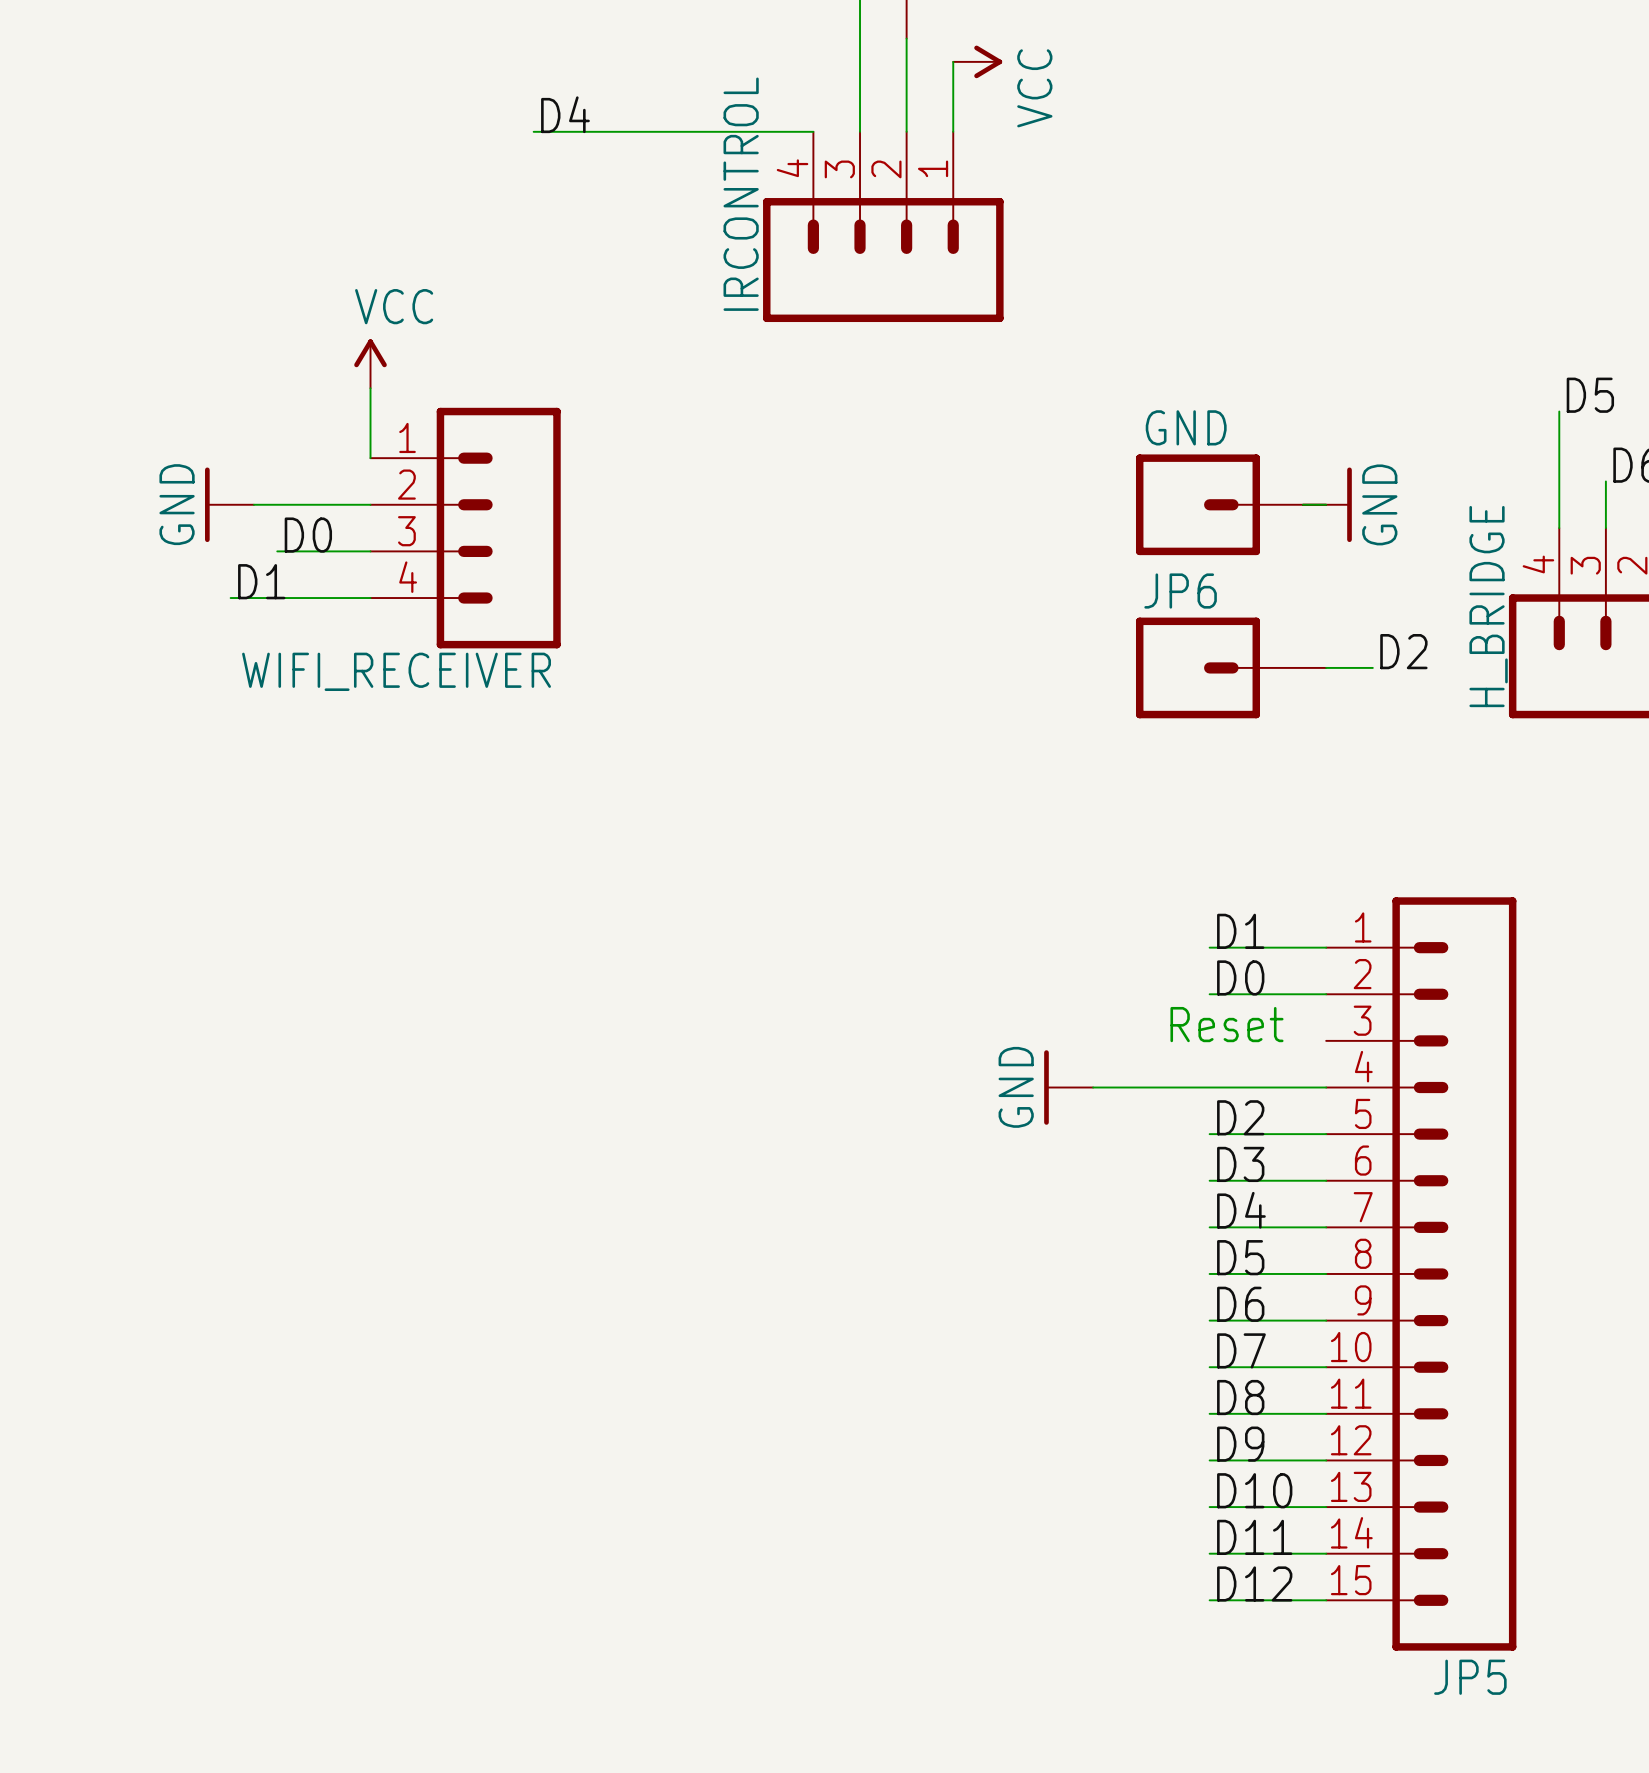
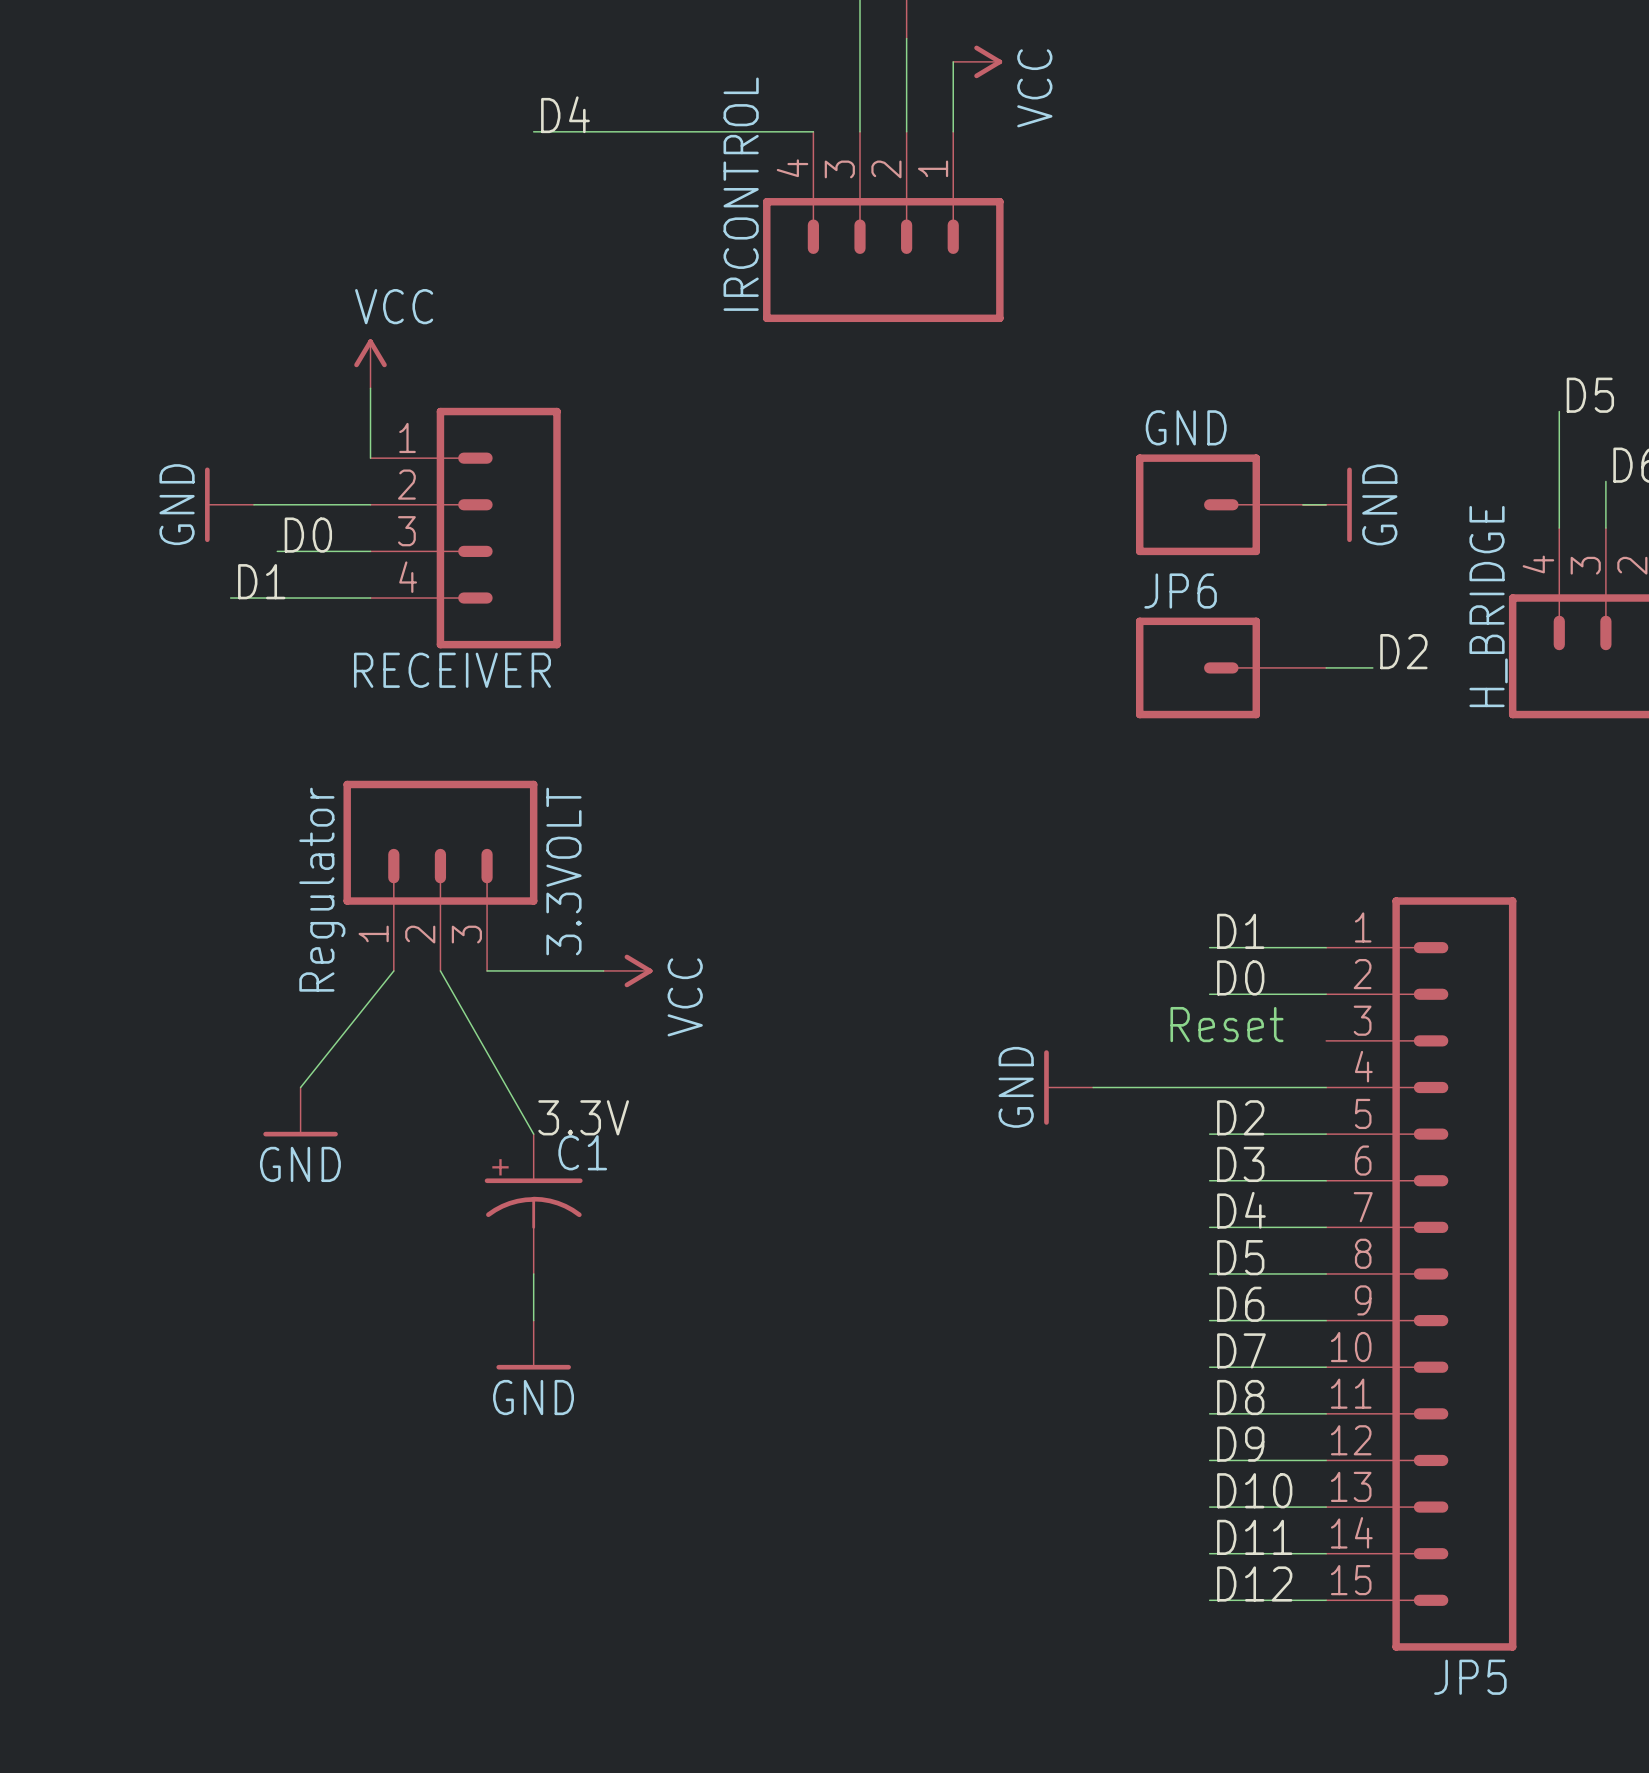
WIFI_RECEIVER name: WIFI_RECEIVER (396, 671) -> RECEIVER (452, 670)
3.3VOLT: none -> Regulator (440, 875)
wire: none -> (393, 970) (300, 1087)
wire: none -> (440, 970) (533, 1134)
wire: none -> (487, 970) (603, 970)
power symbol: none -> VCC (628, 970)
power symbol: none -> GND (300, 1111)
label: none -> 3.3V (583, 1117)
C1: none -> (533, 1204)
wire: none -> (533, 1273) (533, 1320)
power symbol: none -> GND (533, 1345)

